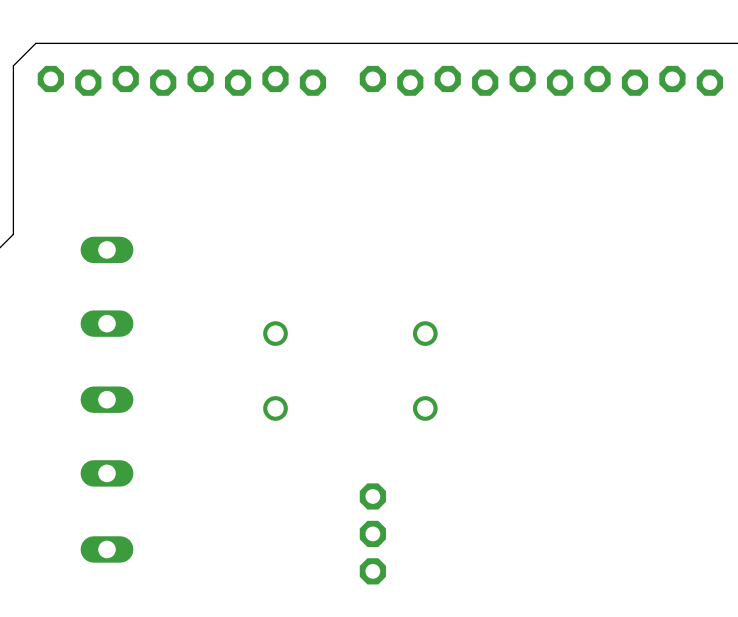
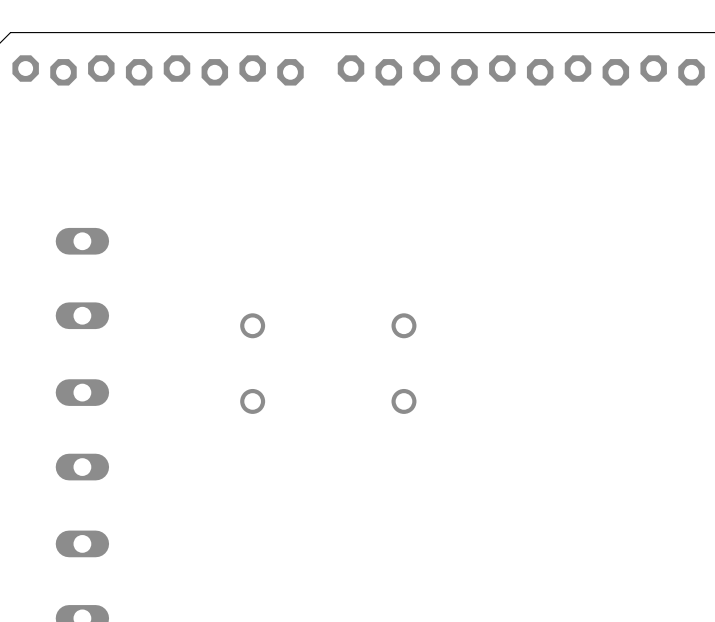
part: (372, 533) -> none

